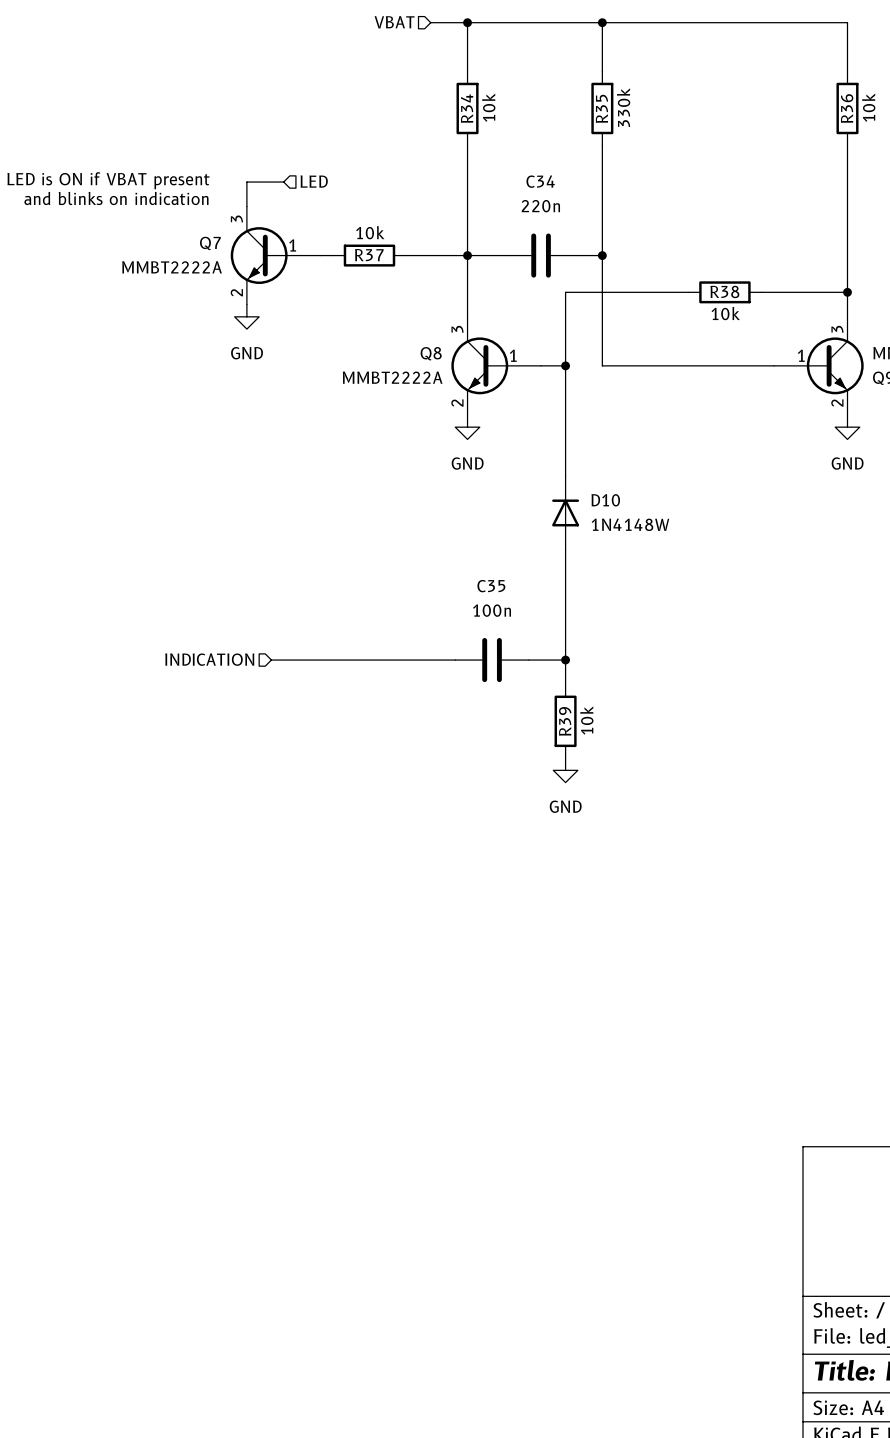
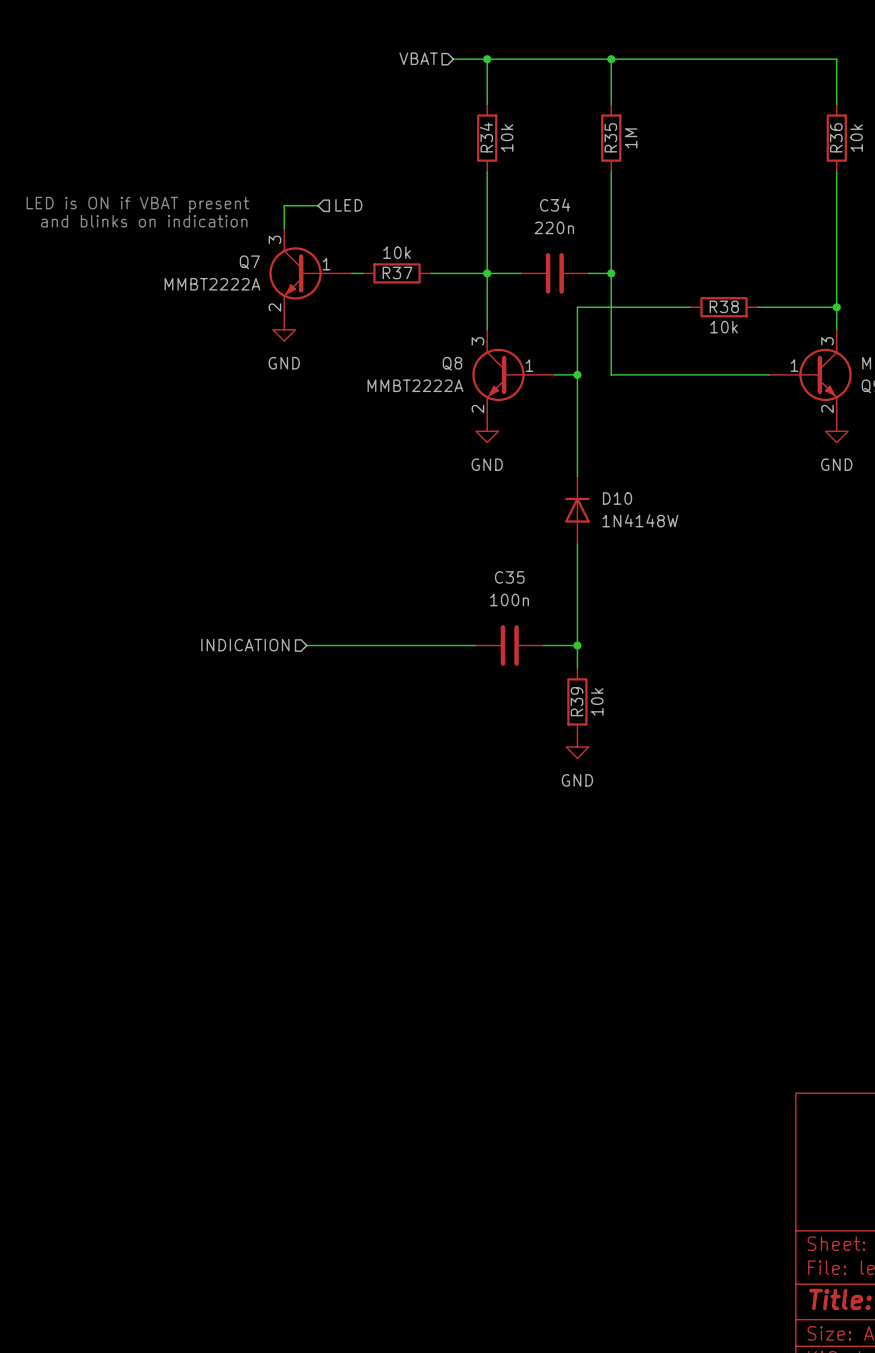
R35 value: 330k (623, 107) -> 1M (631, 138)

